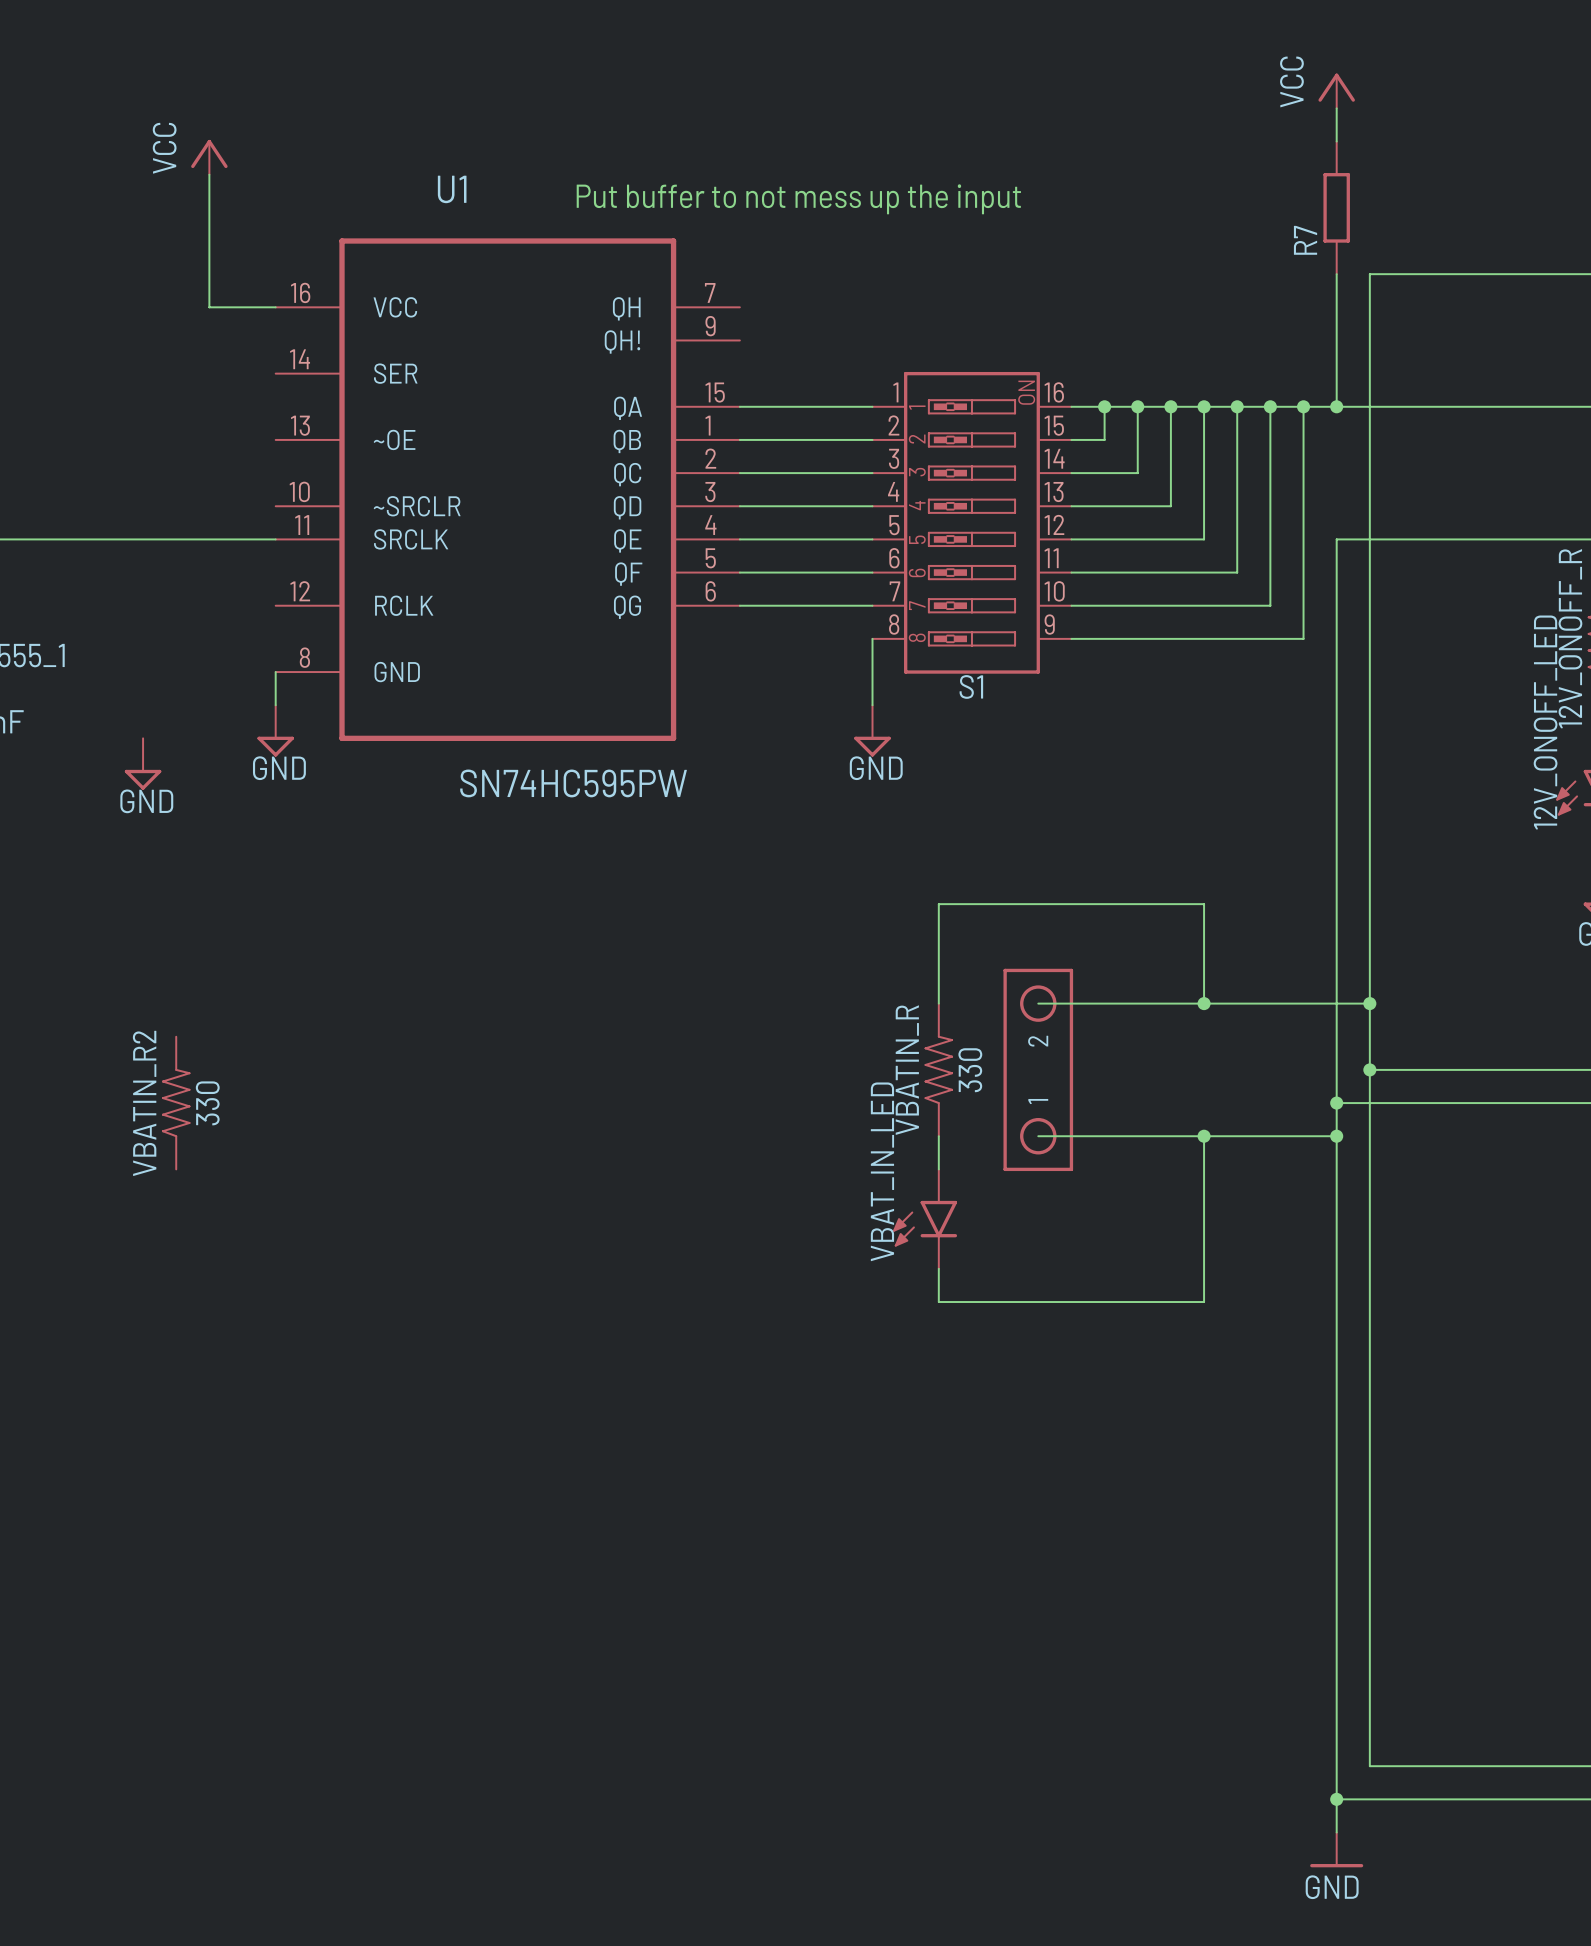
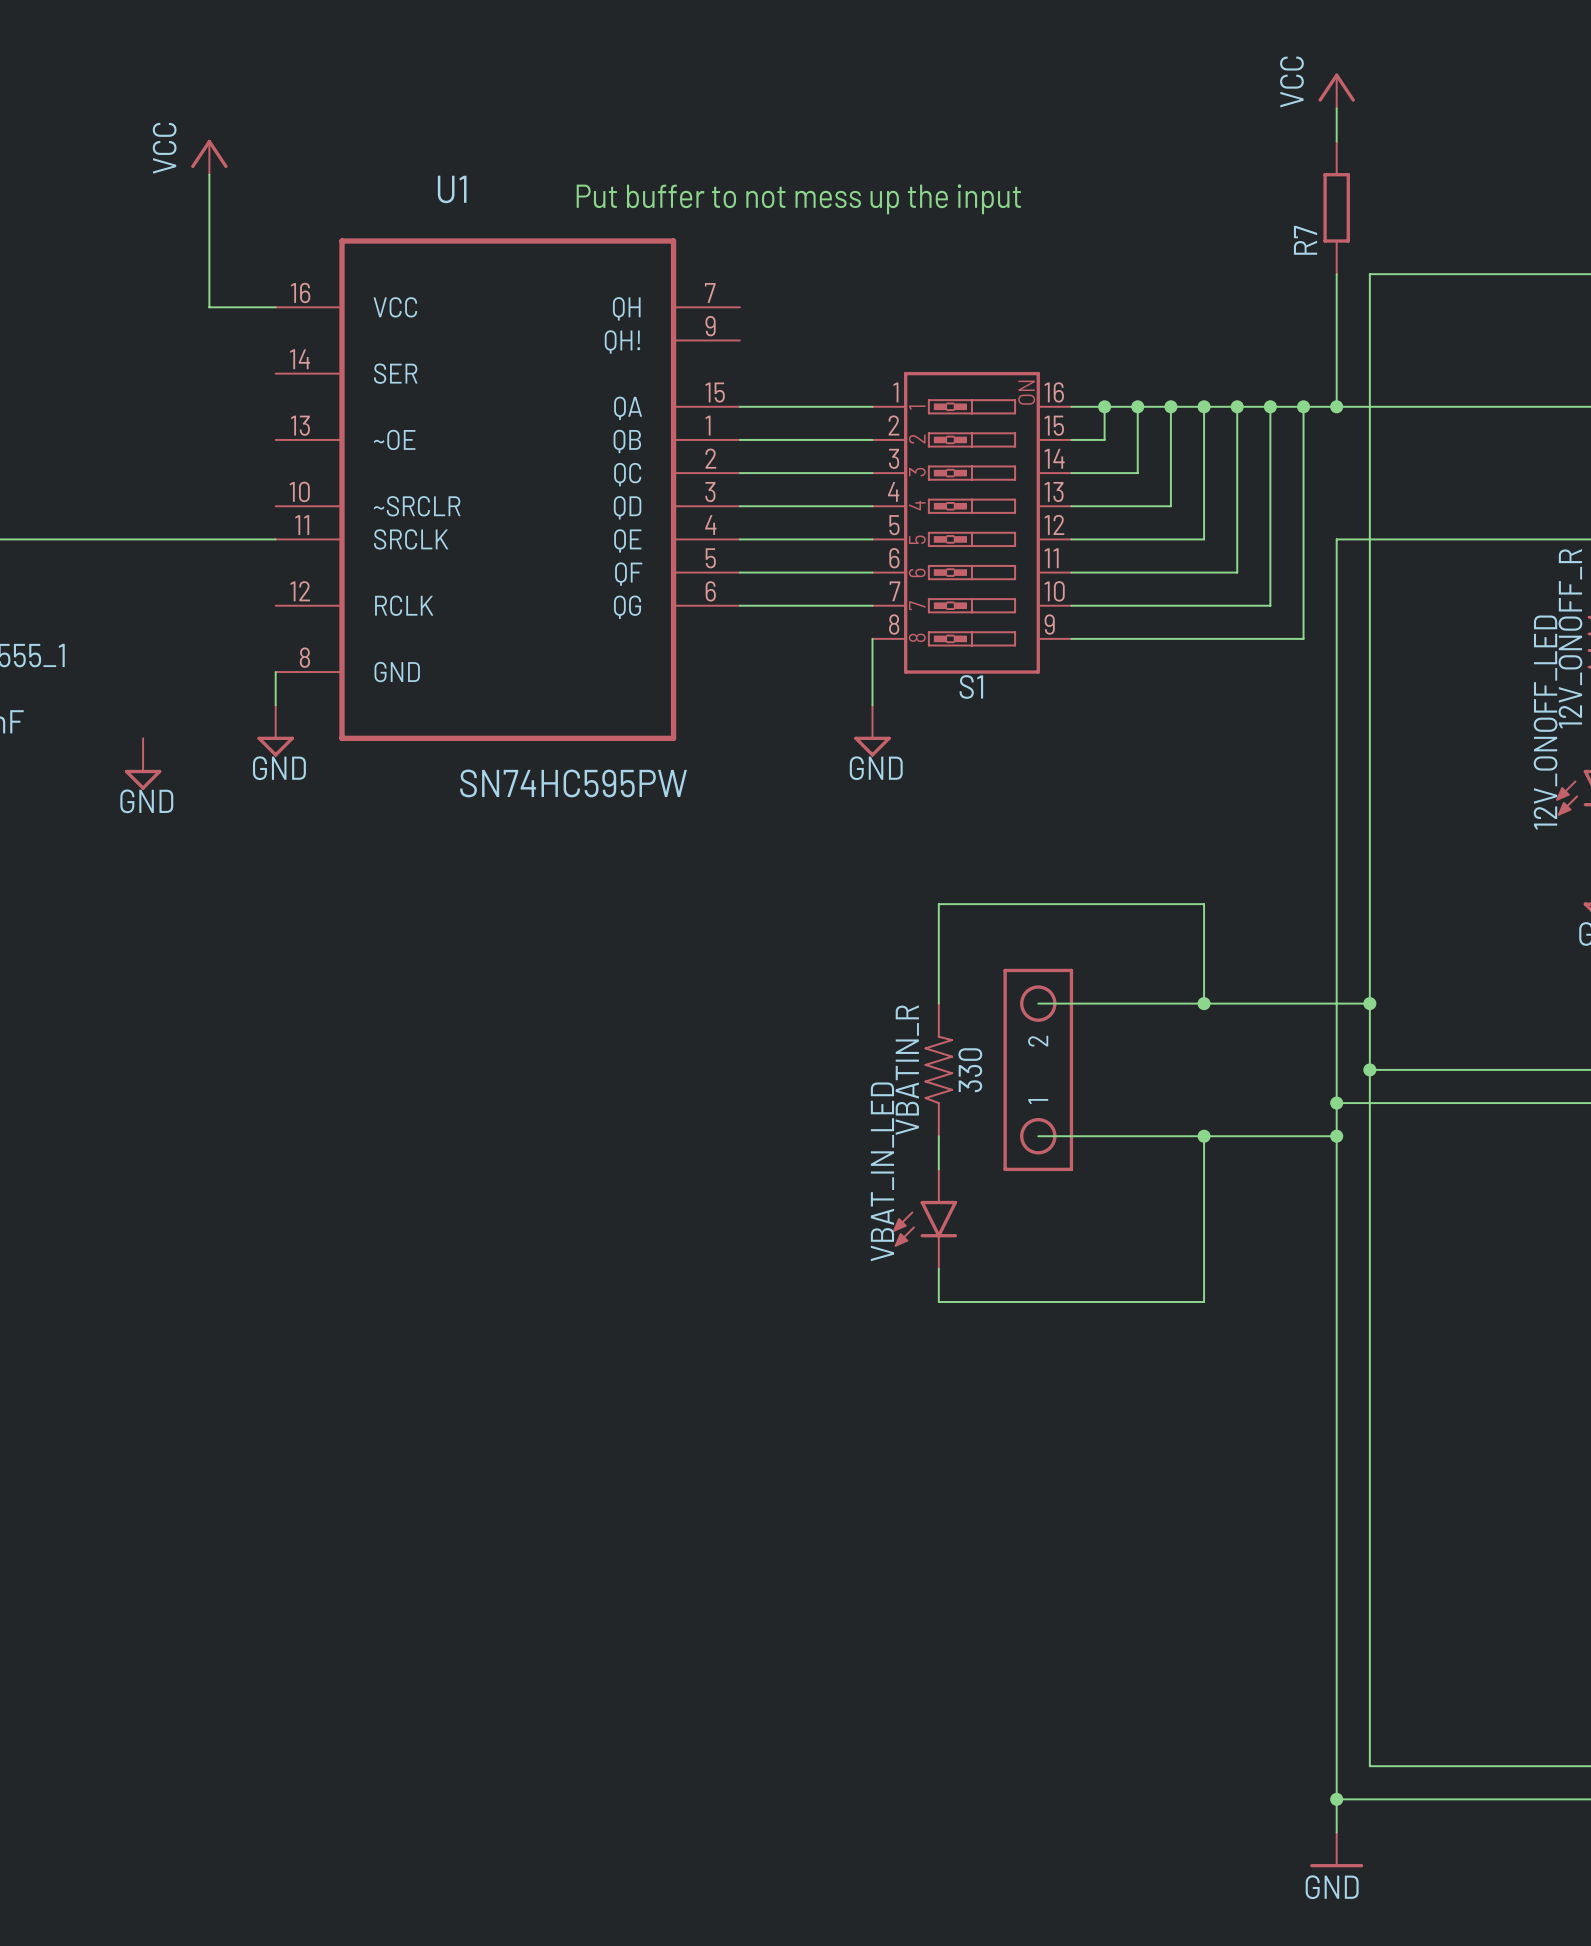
VBATIN_R2: 330 (176, 1103) -> none

